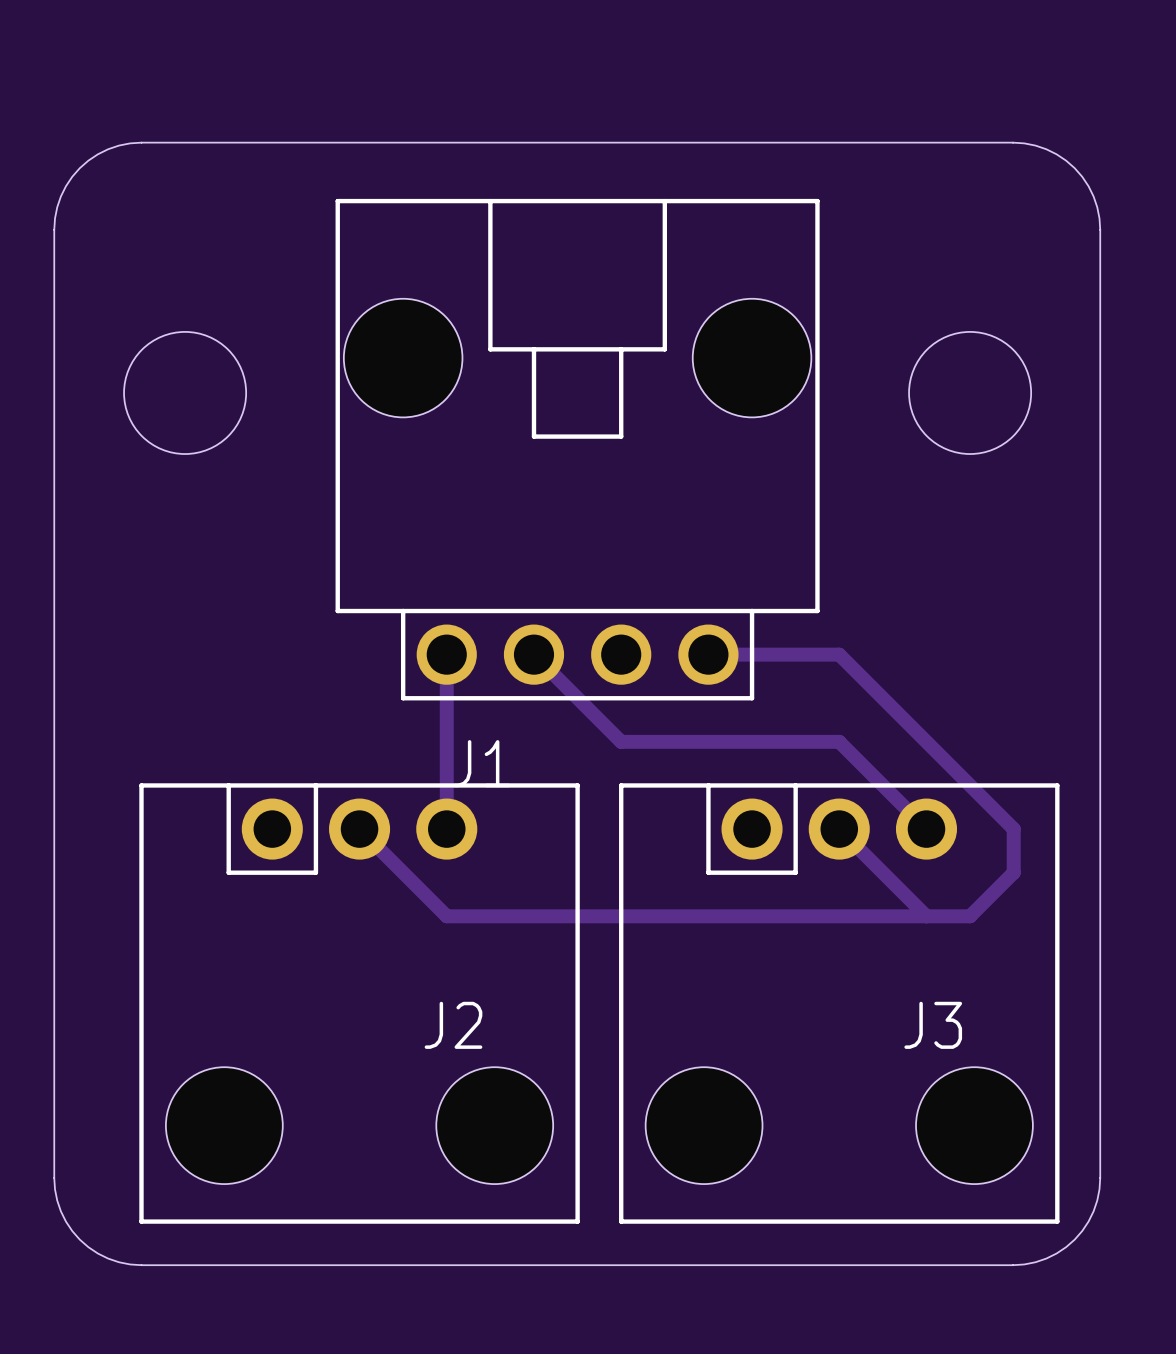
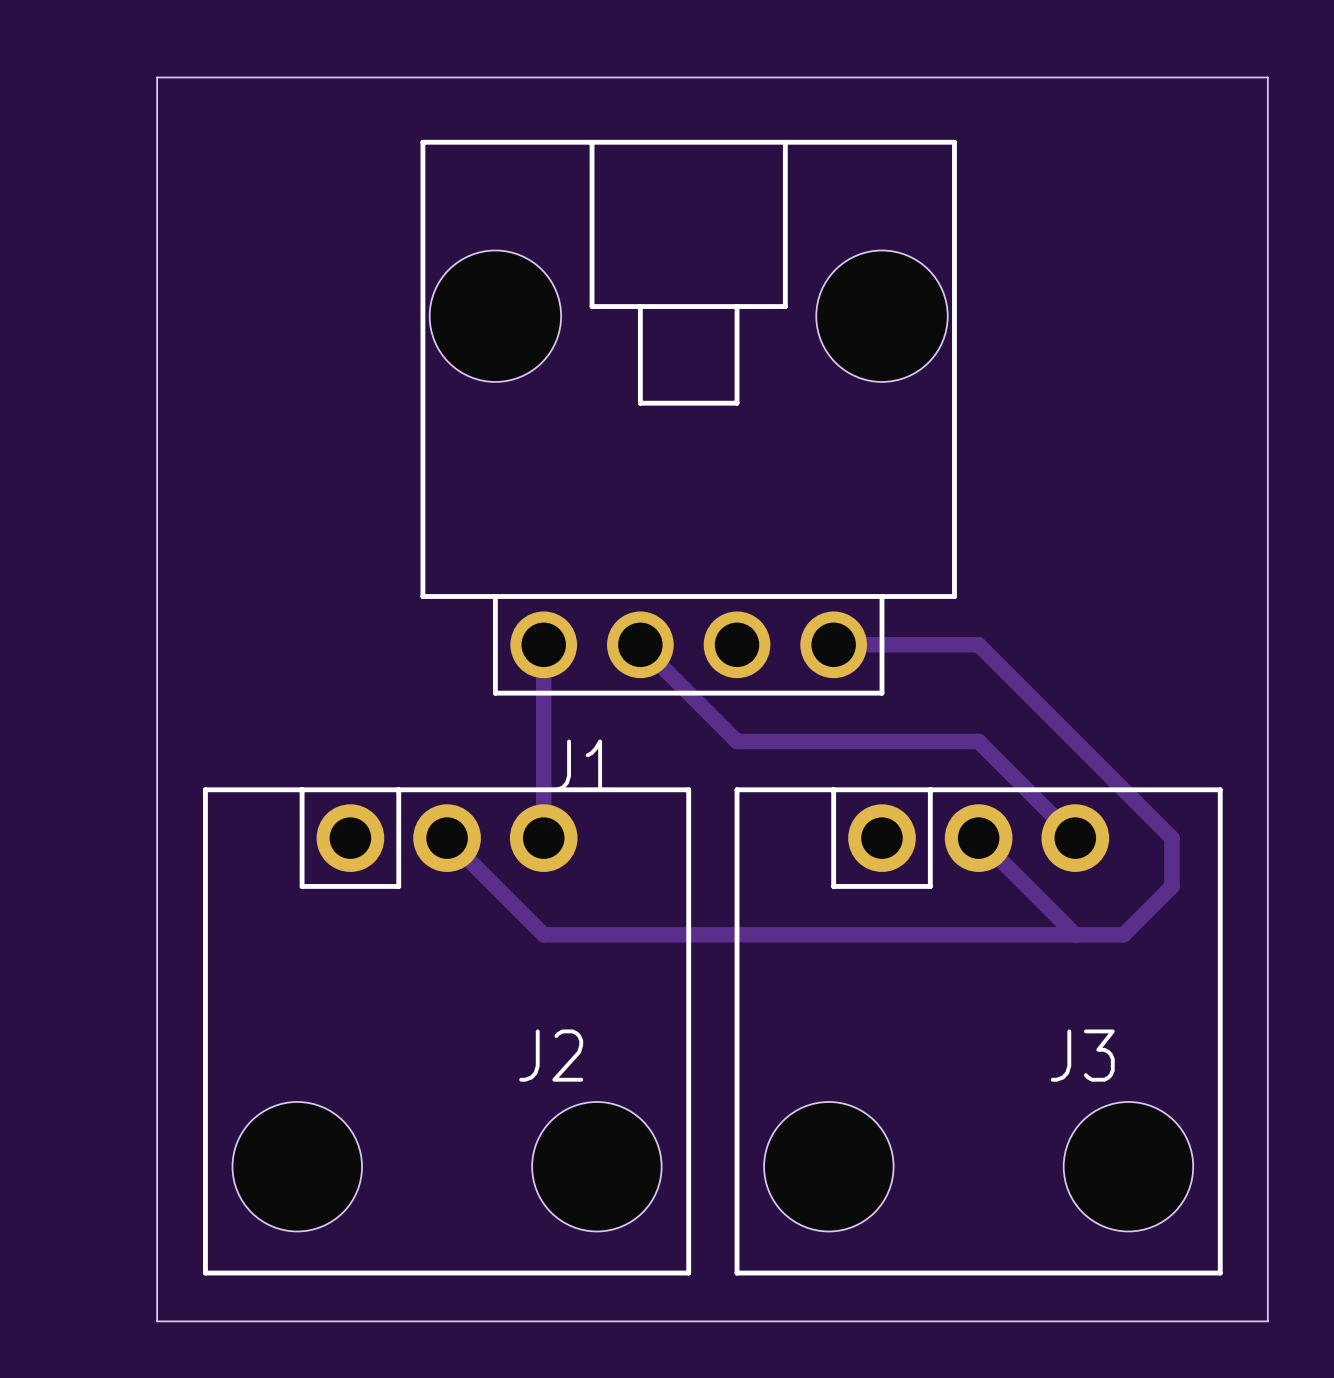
board edge: (141, 142) (108, 149) (79, 168) (60, 196) (54, 229) (55, 1189) (60, 1211) (79, 1239) (108, 1258) (141, 1265) -> (205, 77) (157, 77) (157, 1321) (205, 1321)
board edge: (1013, 142) (1046, 149) (1074, 168) (1093, 196) (1100, 229) -> (1171, 77) (1267, 77) (1267, 174)
drawing: [123, 331, 247, 455] -> none
drawing: [908, 331, 1032, 455] -> none
board edge: (1100, 1177) (1093, 1211) (1074, 1239) (1046, 1258) (1013, 1265) -> (1267, 1224) (1267, 1321) (1171, 1321)

